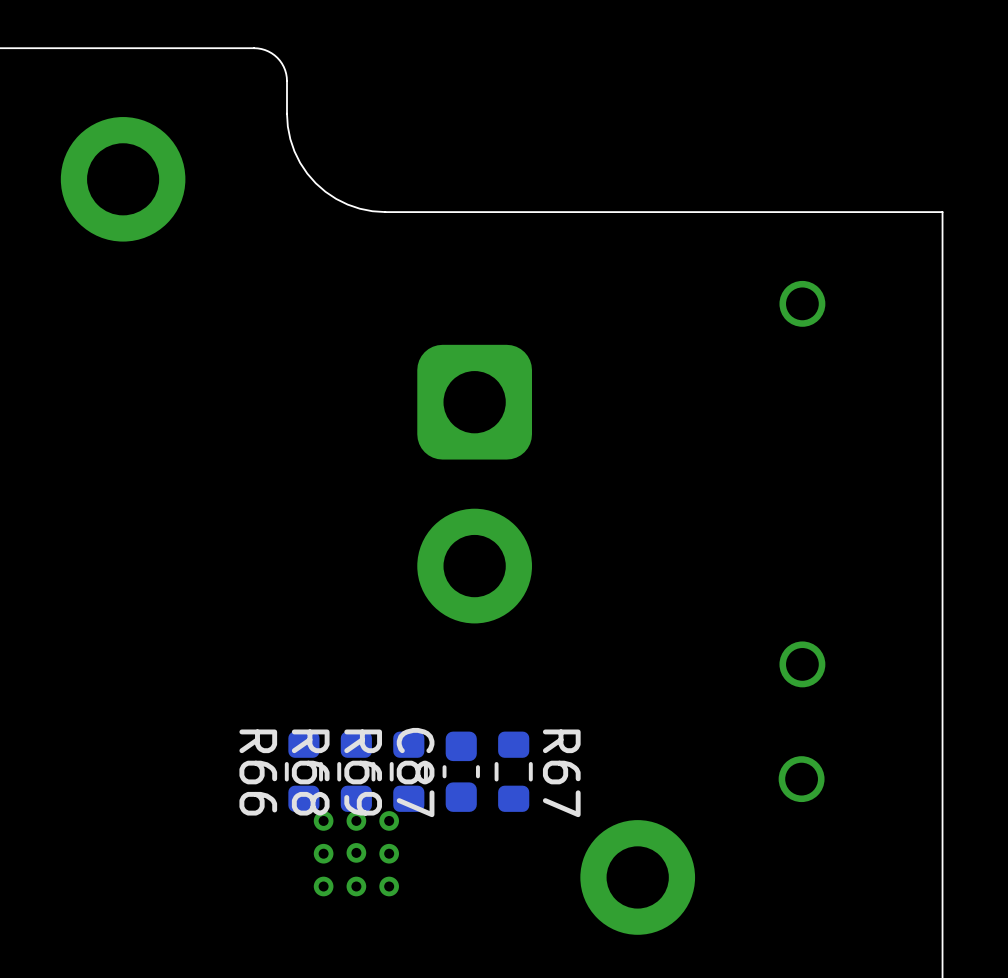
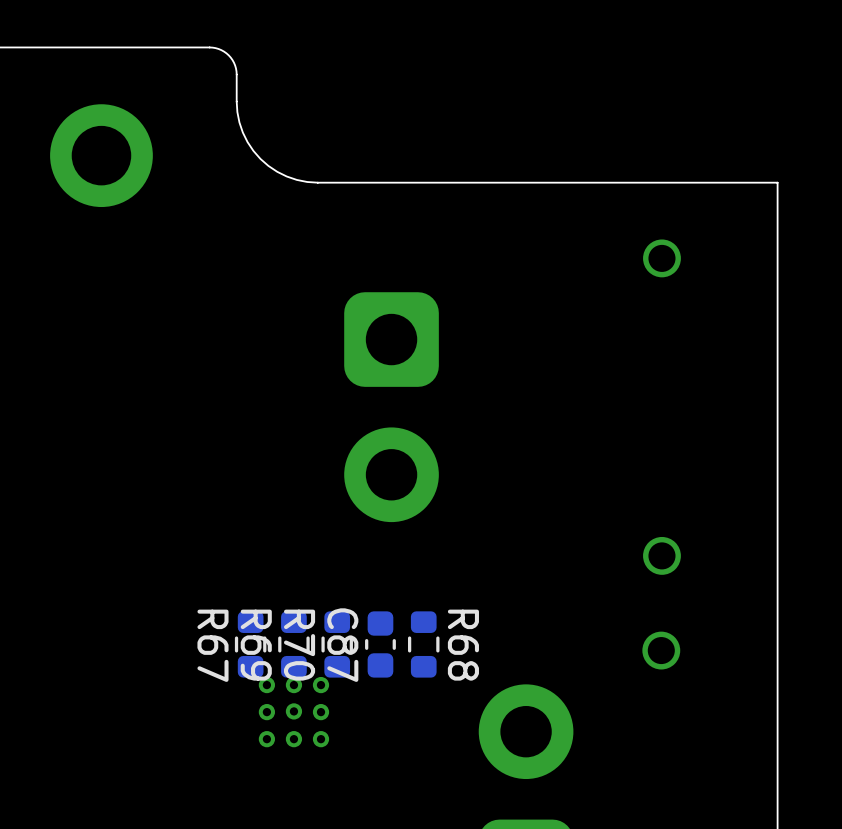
R66 name: R66 (258, 772) -> R67 (212, 645)
R68 name: R68 (310, 772) -> R69 (256, 645)
R69 name: R69 (363, 772) -> R70 (299, 645)
R67 name: R67 (561, 773) -> R68 (463, 645)

